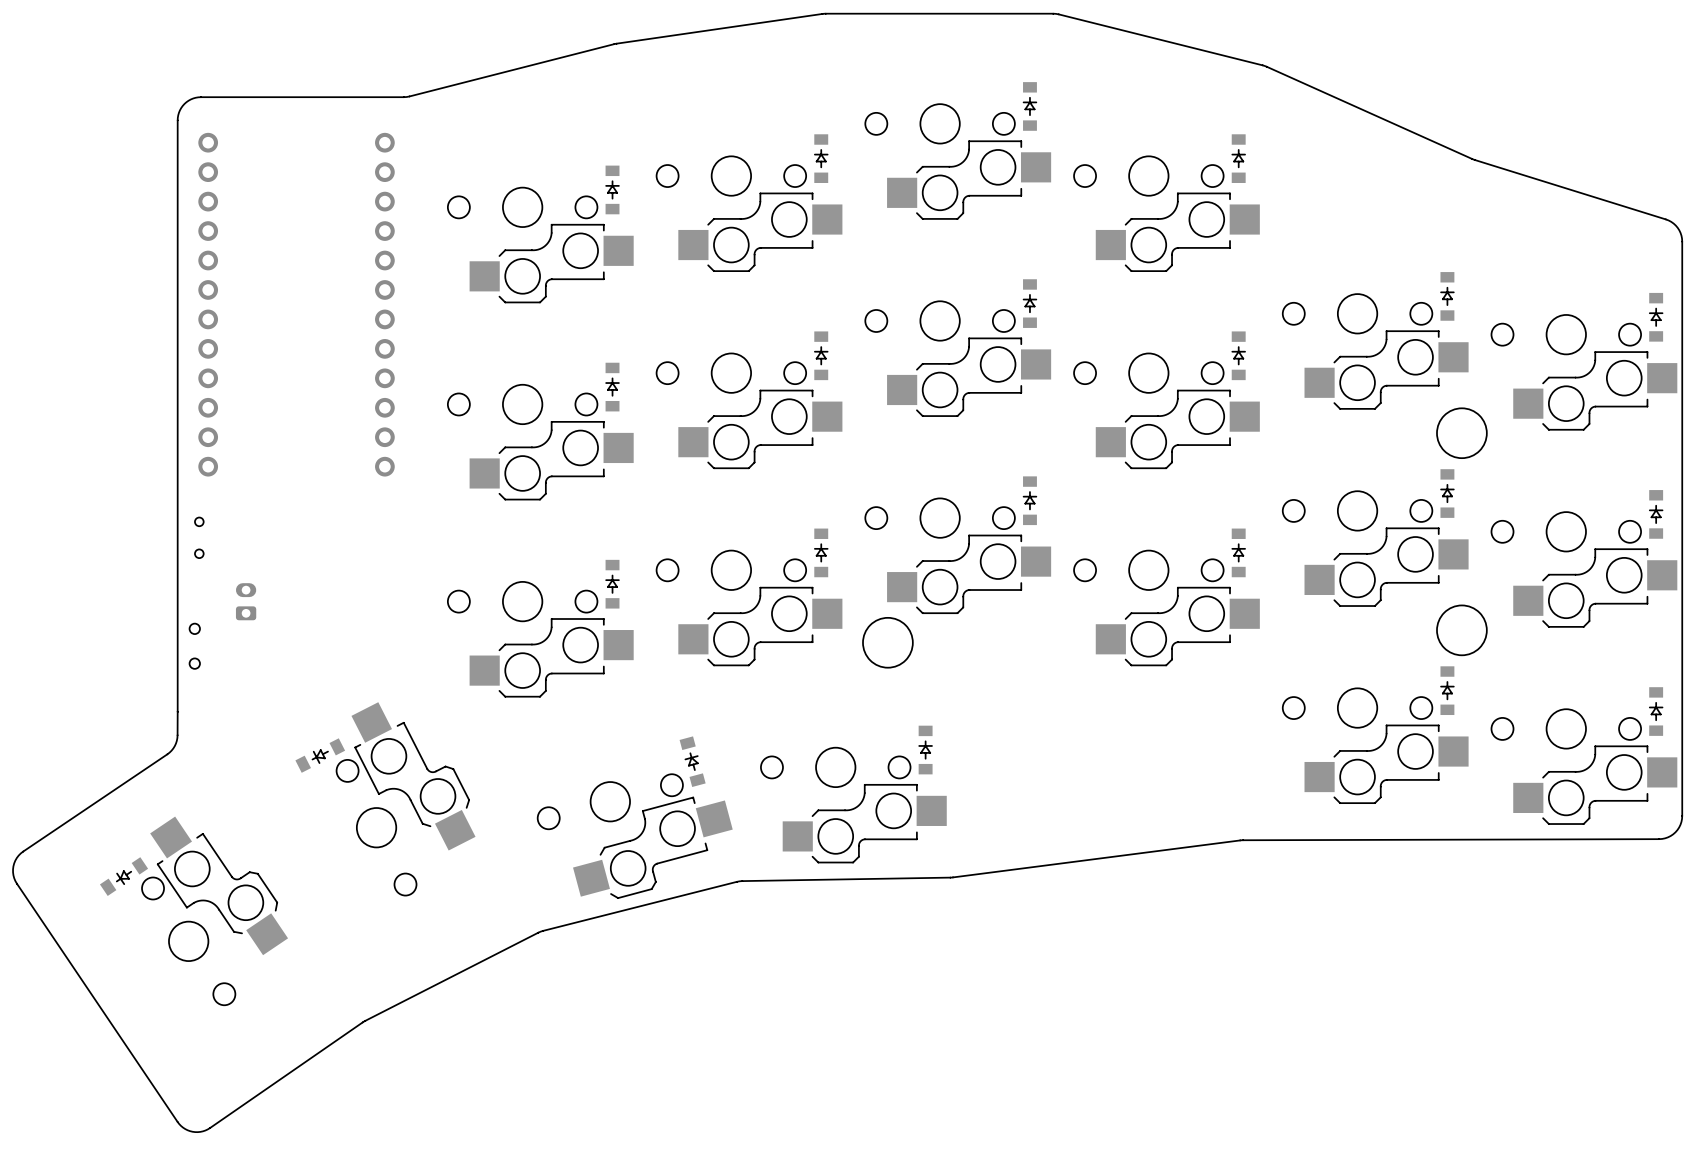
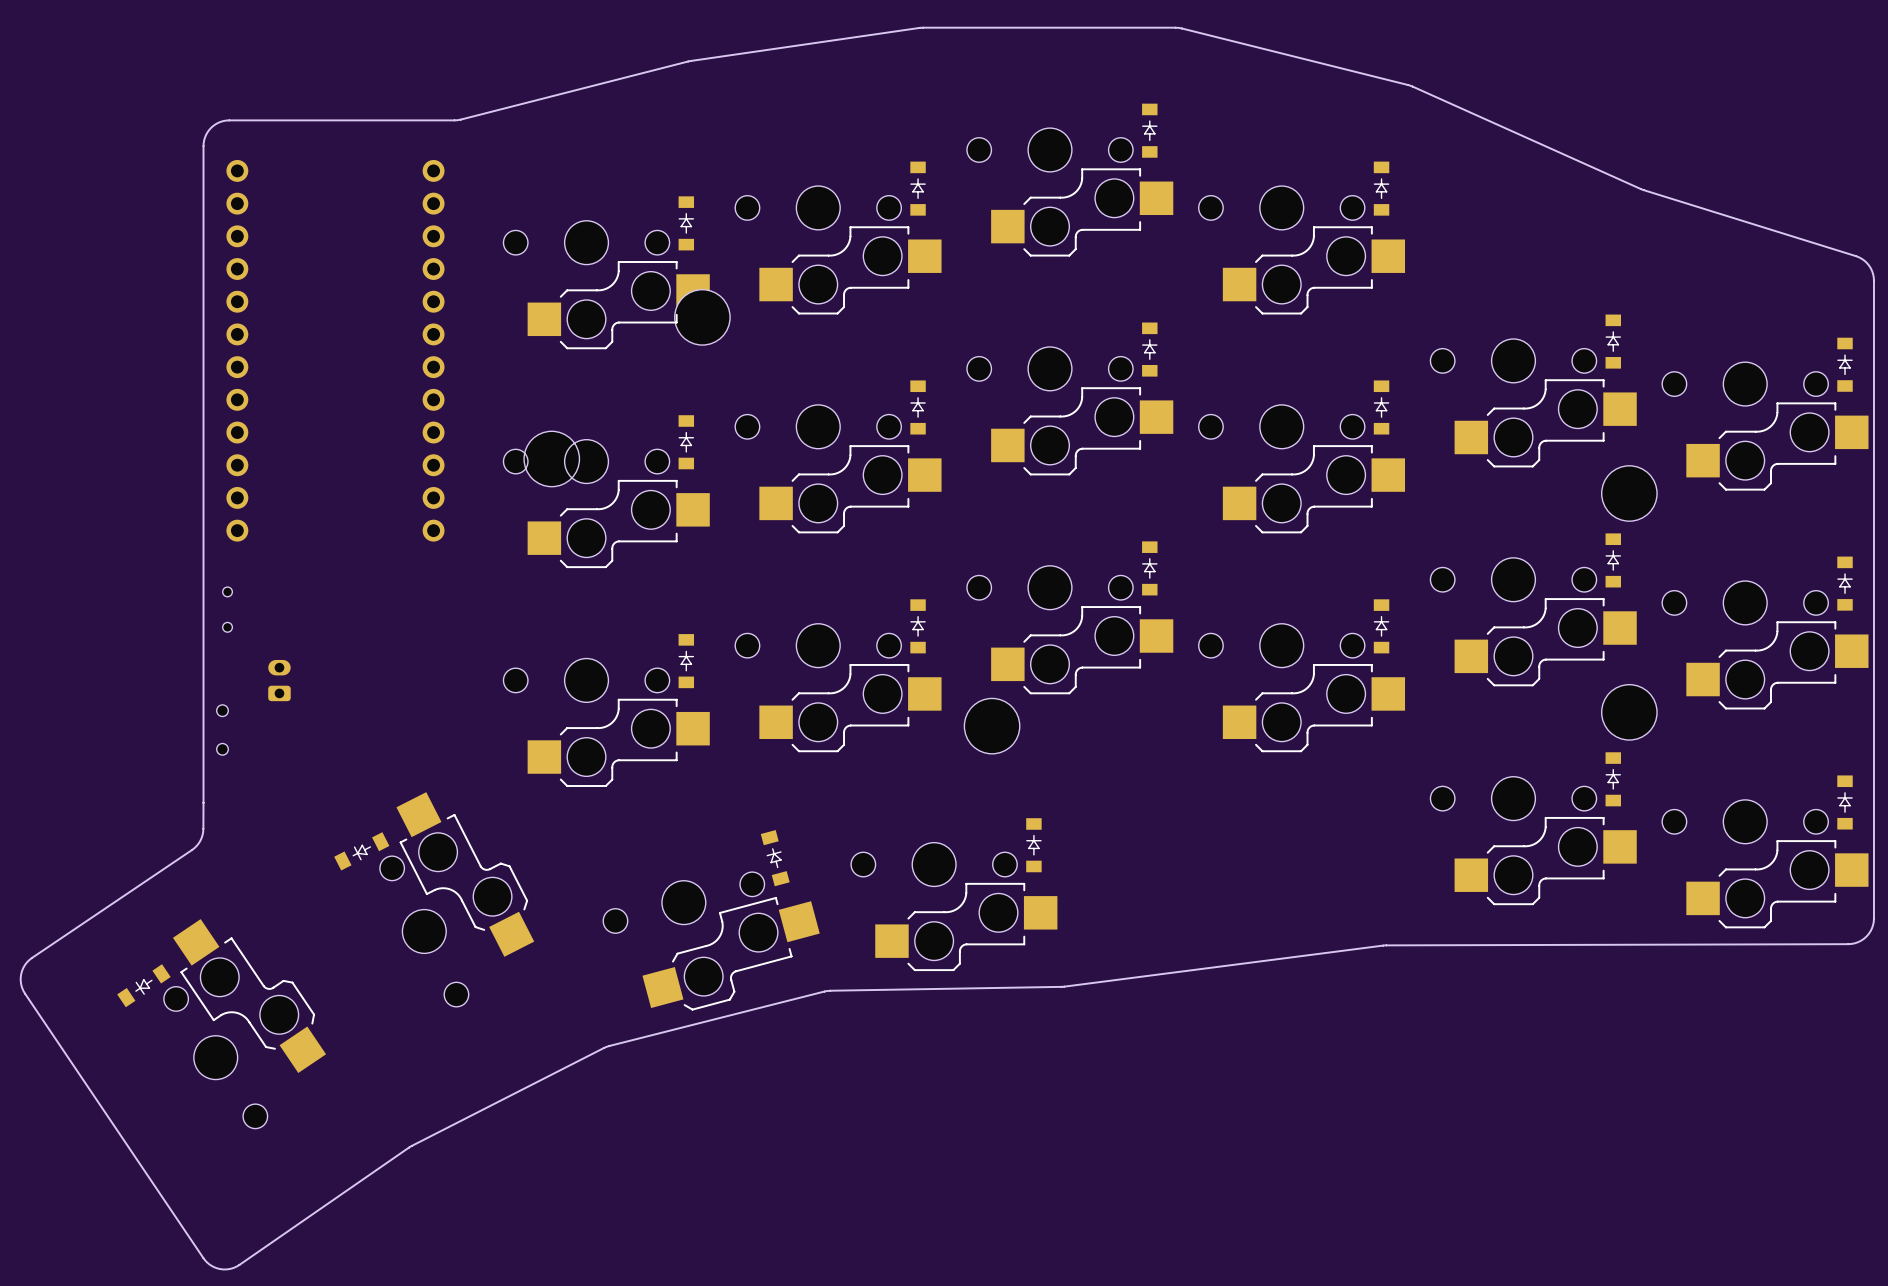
part: none -> (702, 317)
part: none -> (551, 458)

